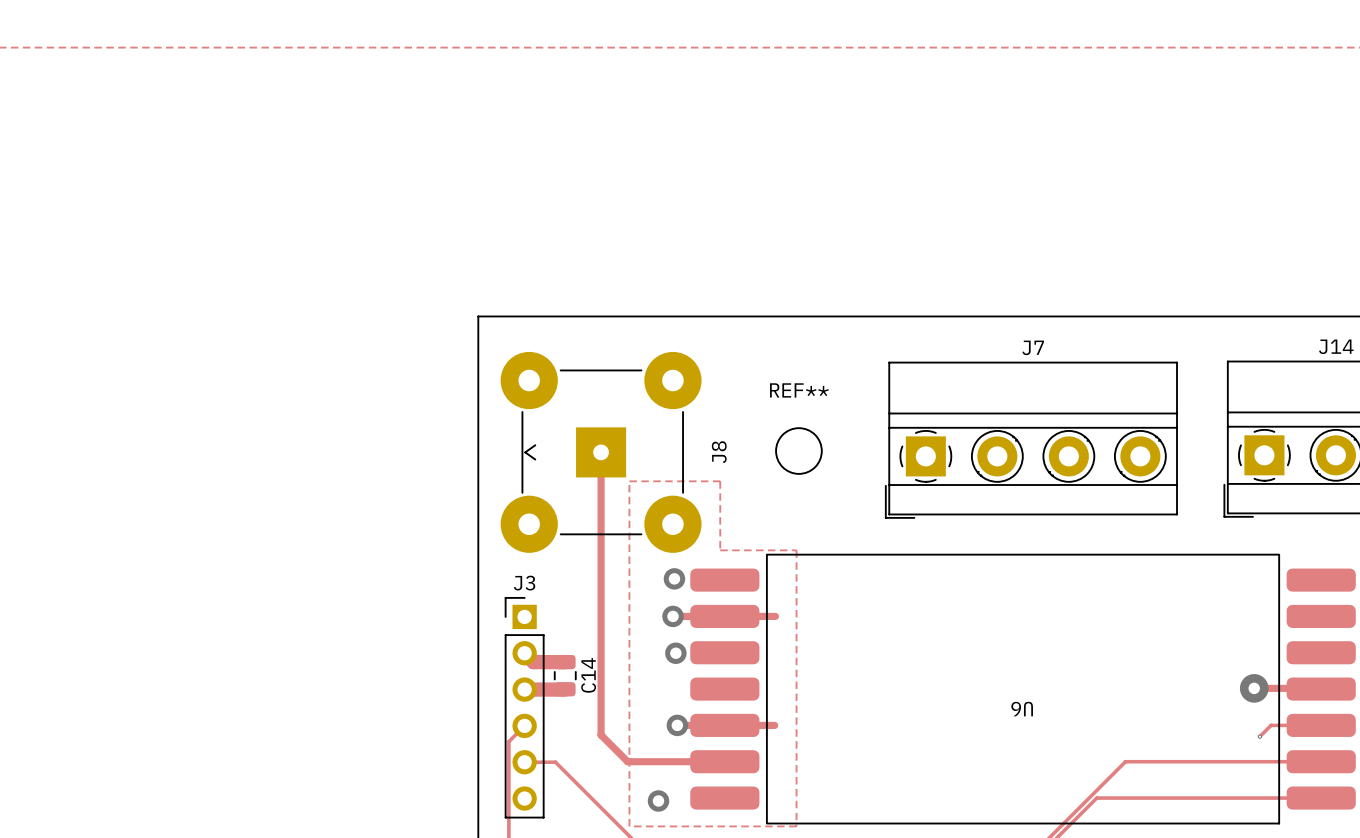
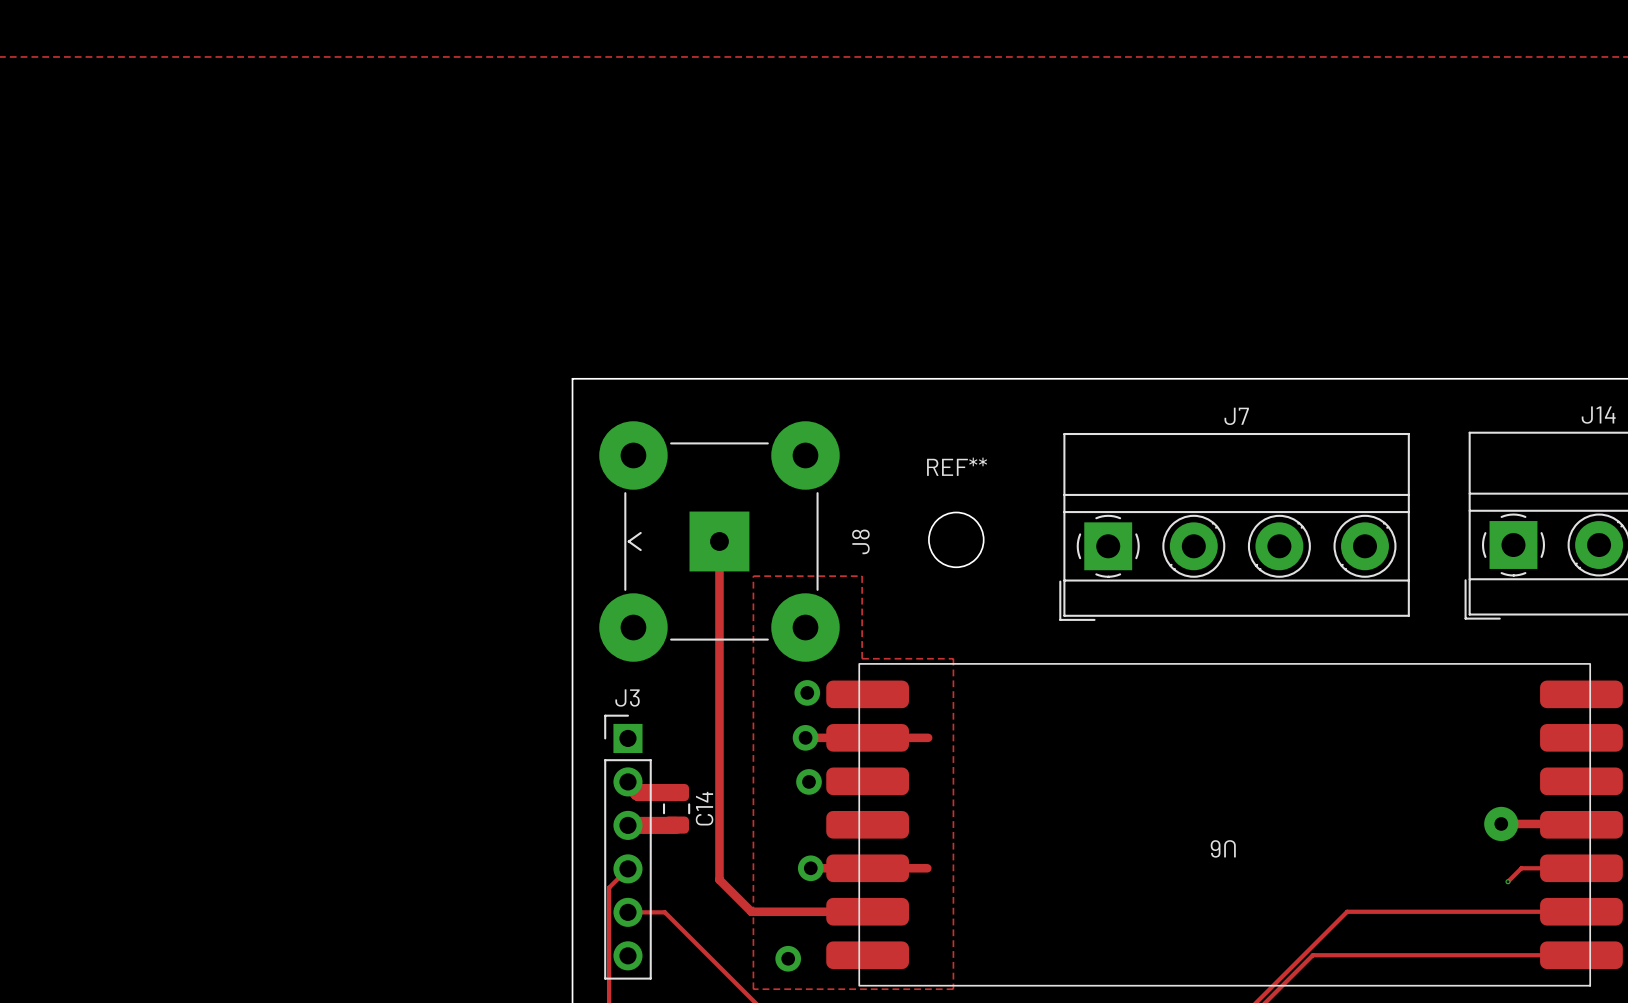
U6 footprint: [690, 553, 1356, 825] -> [826, 663, 1623, 987]

